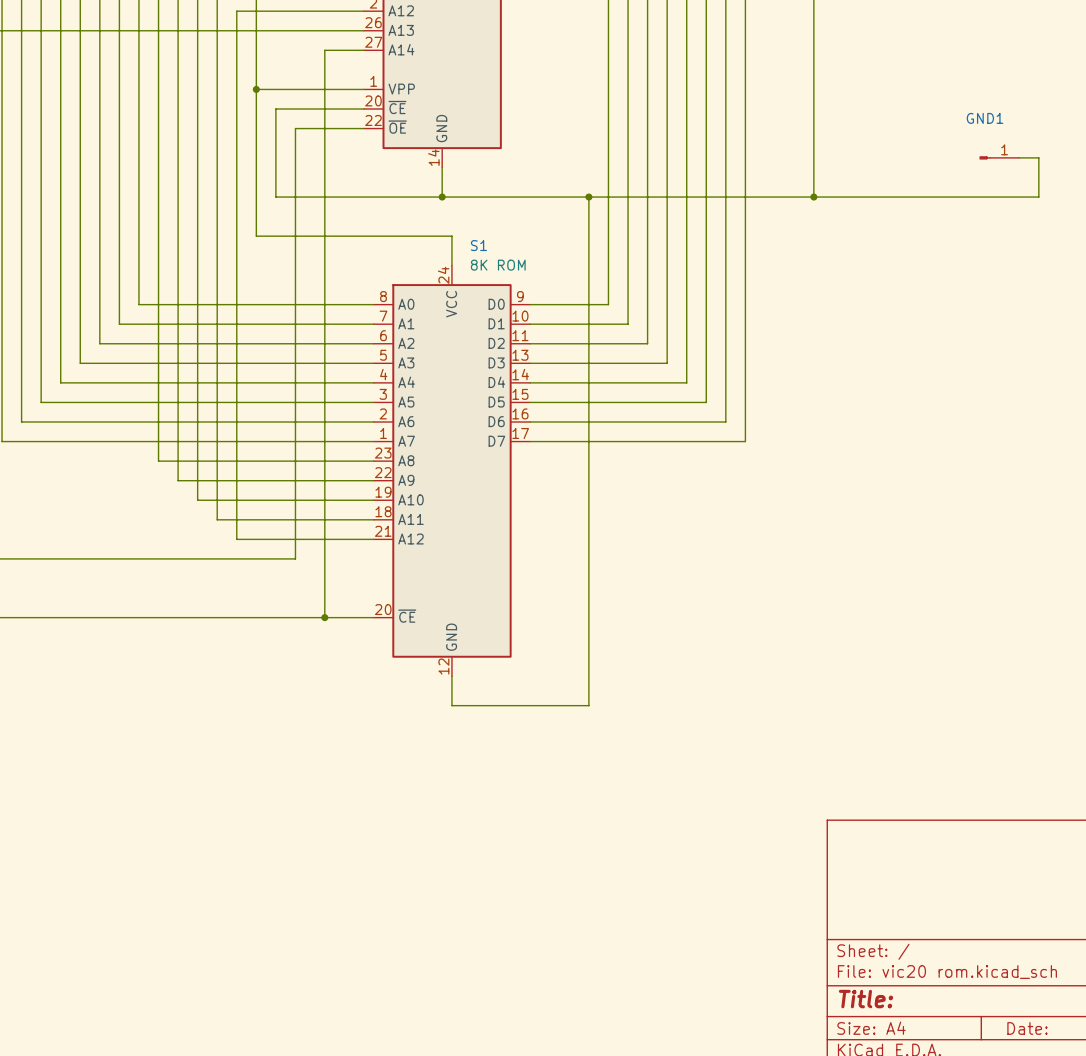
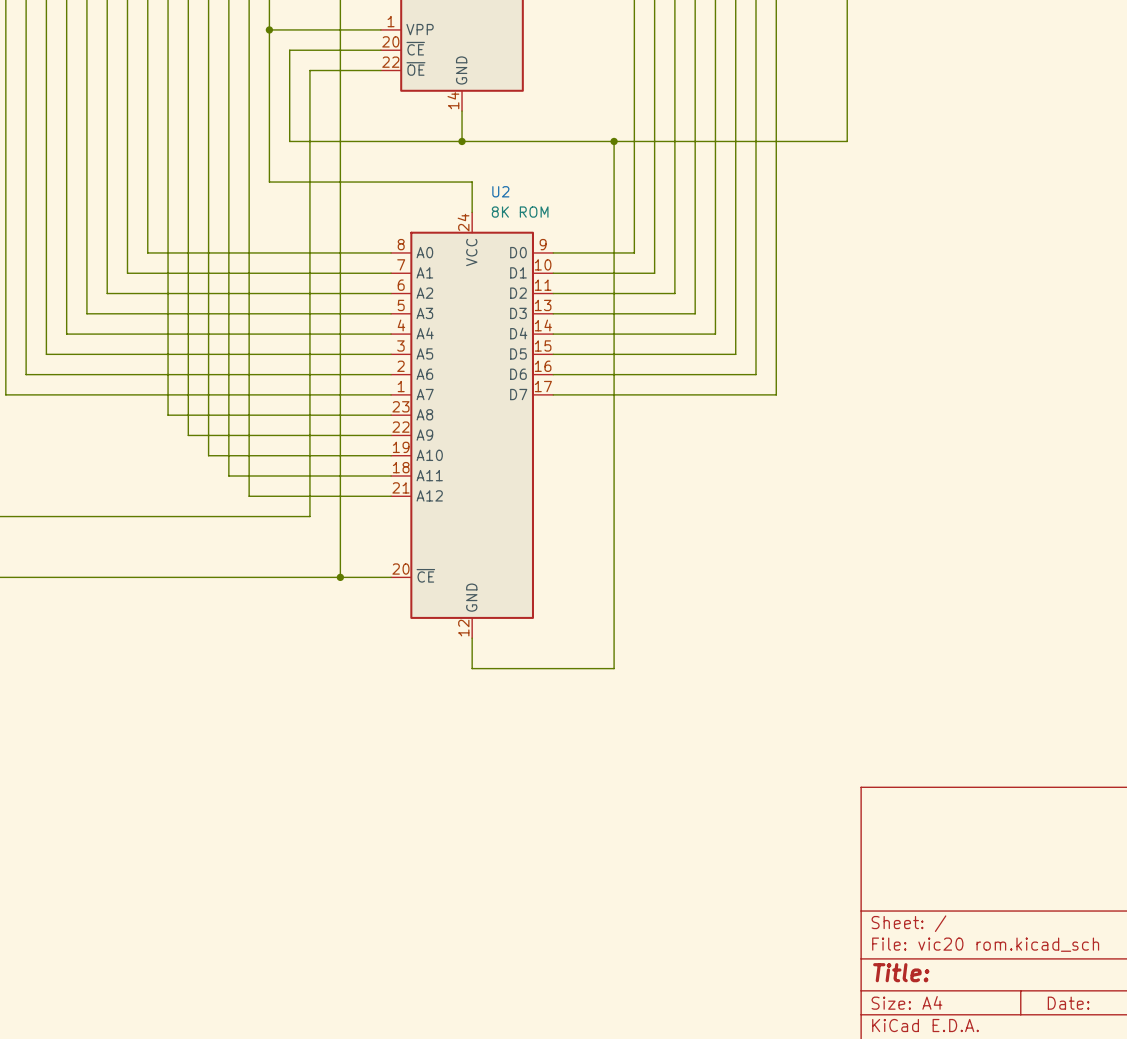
GND1: (999, 157) -> none
wire: (1019, 157) (1038, 157) (1038, 197) (813, 197) -> none
junction: (813, 197) -> none
S1 name: S1 (478, 245) -> U2 (500, 191)

